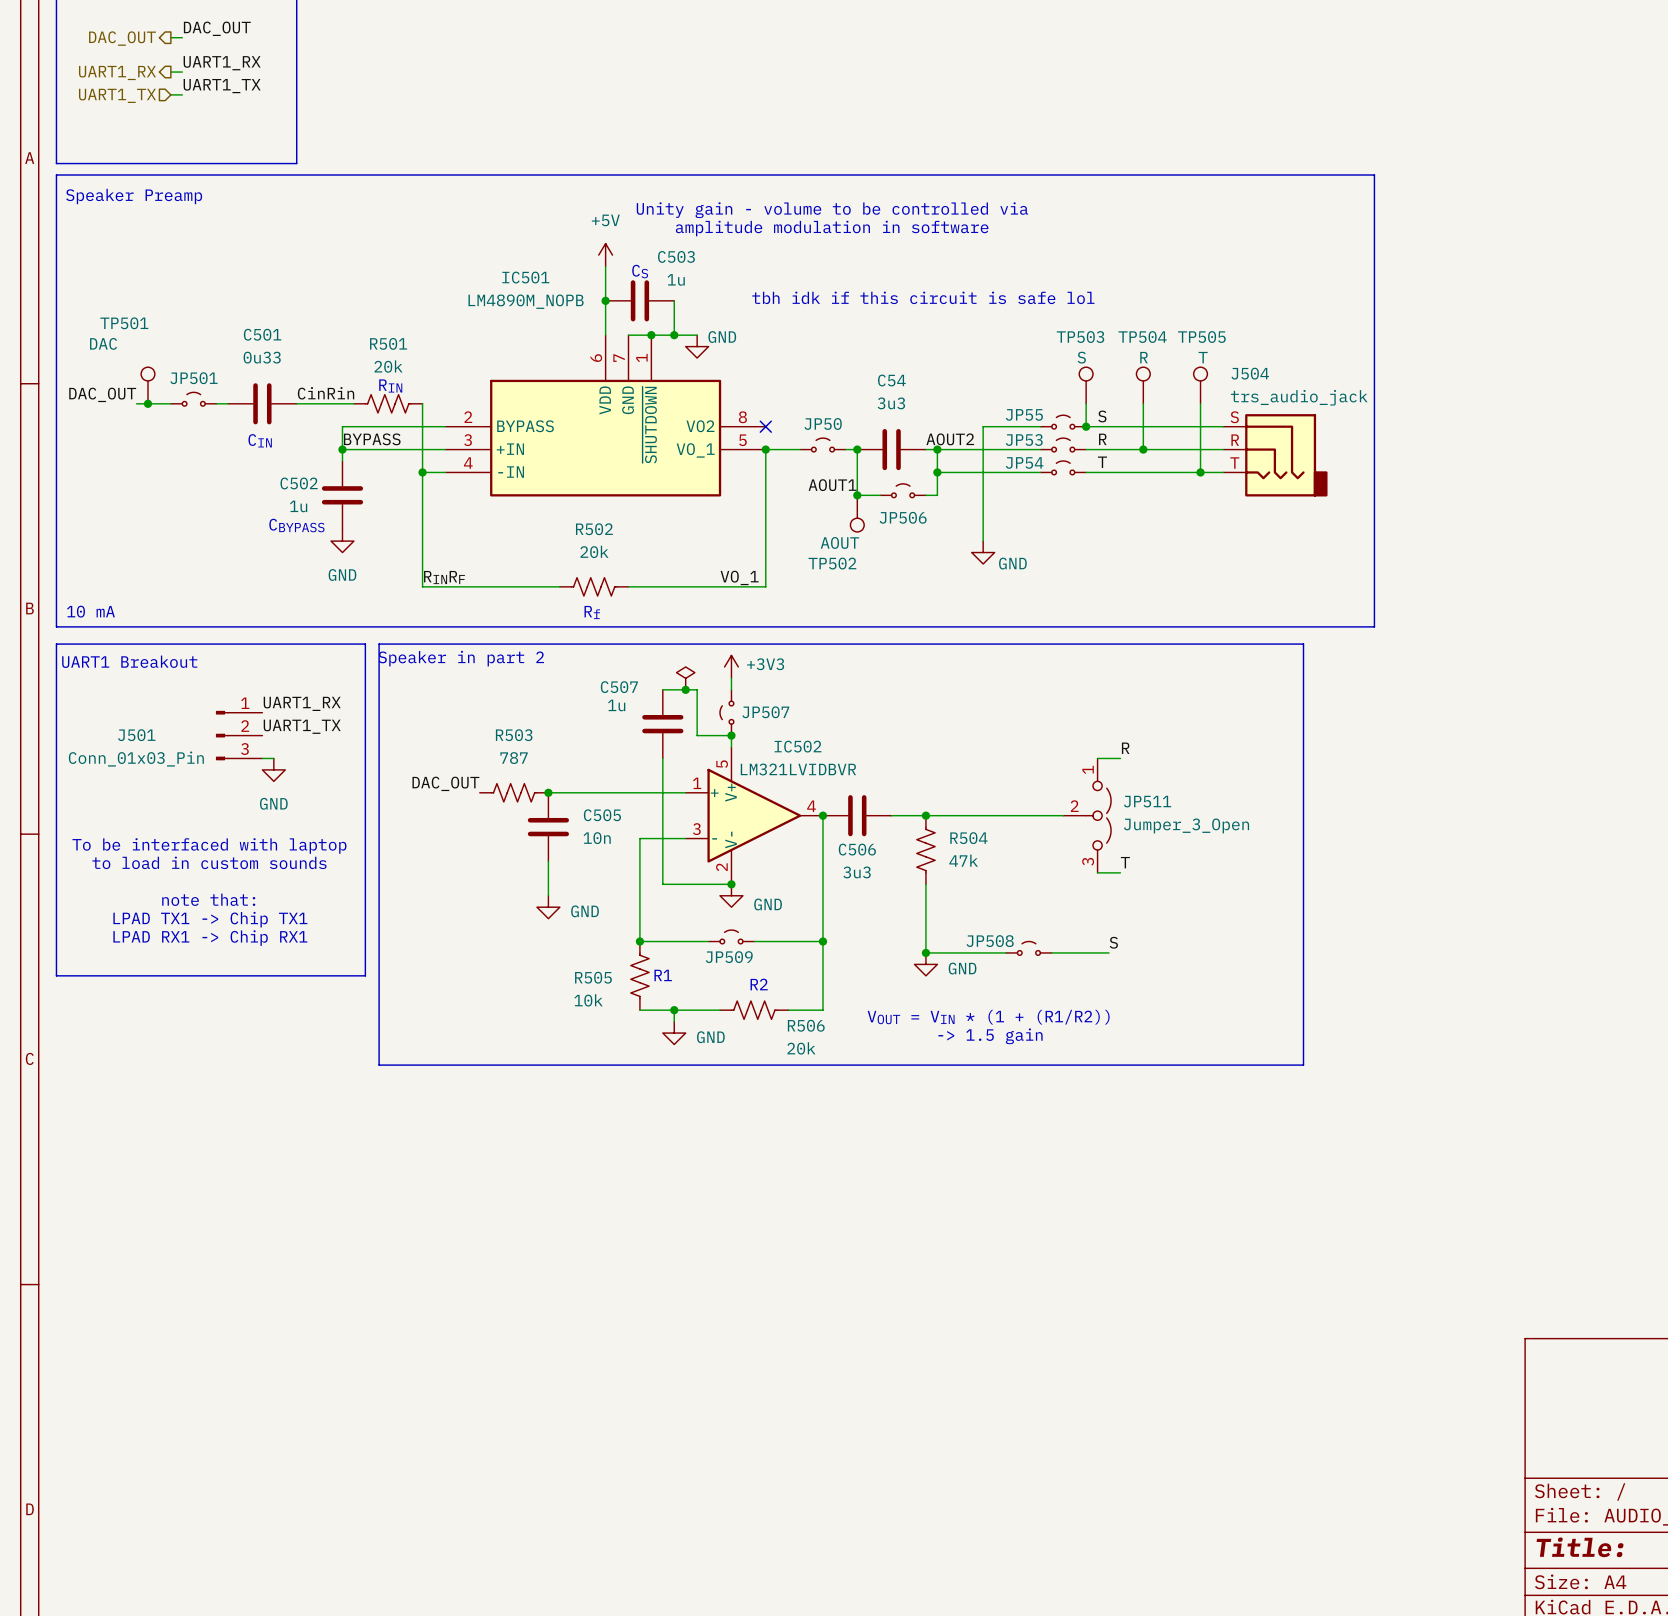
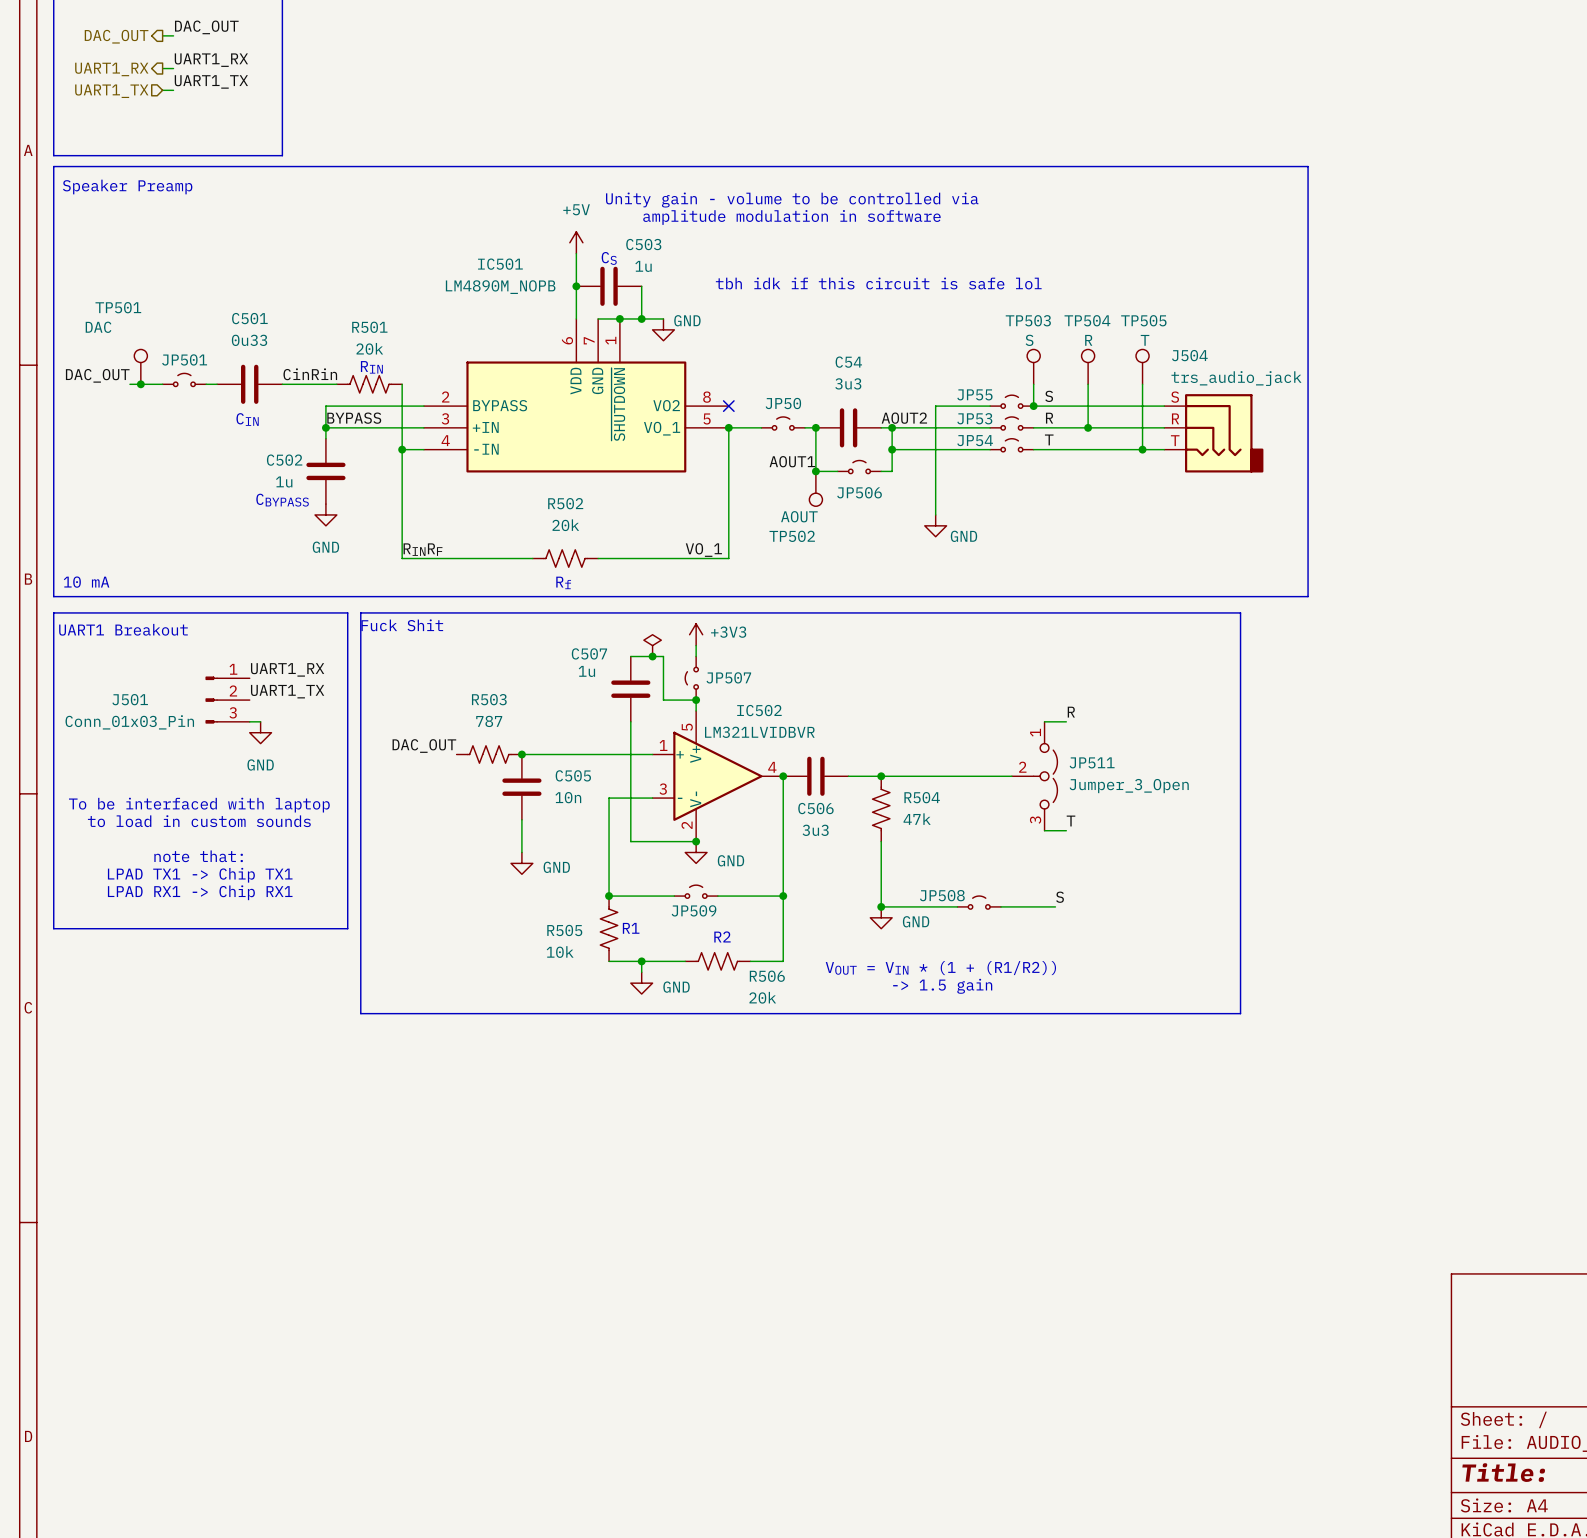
text: none -> Fuck Shit (402, 625)
text: Speaker in part 2 (461, 658) -> none

